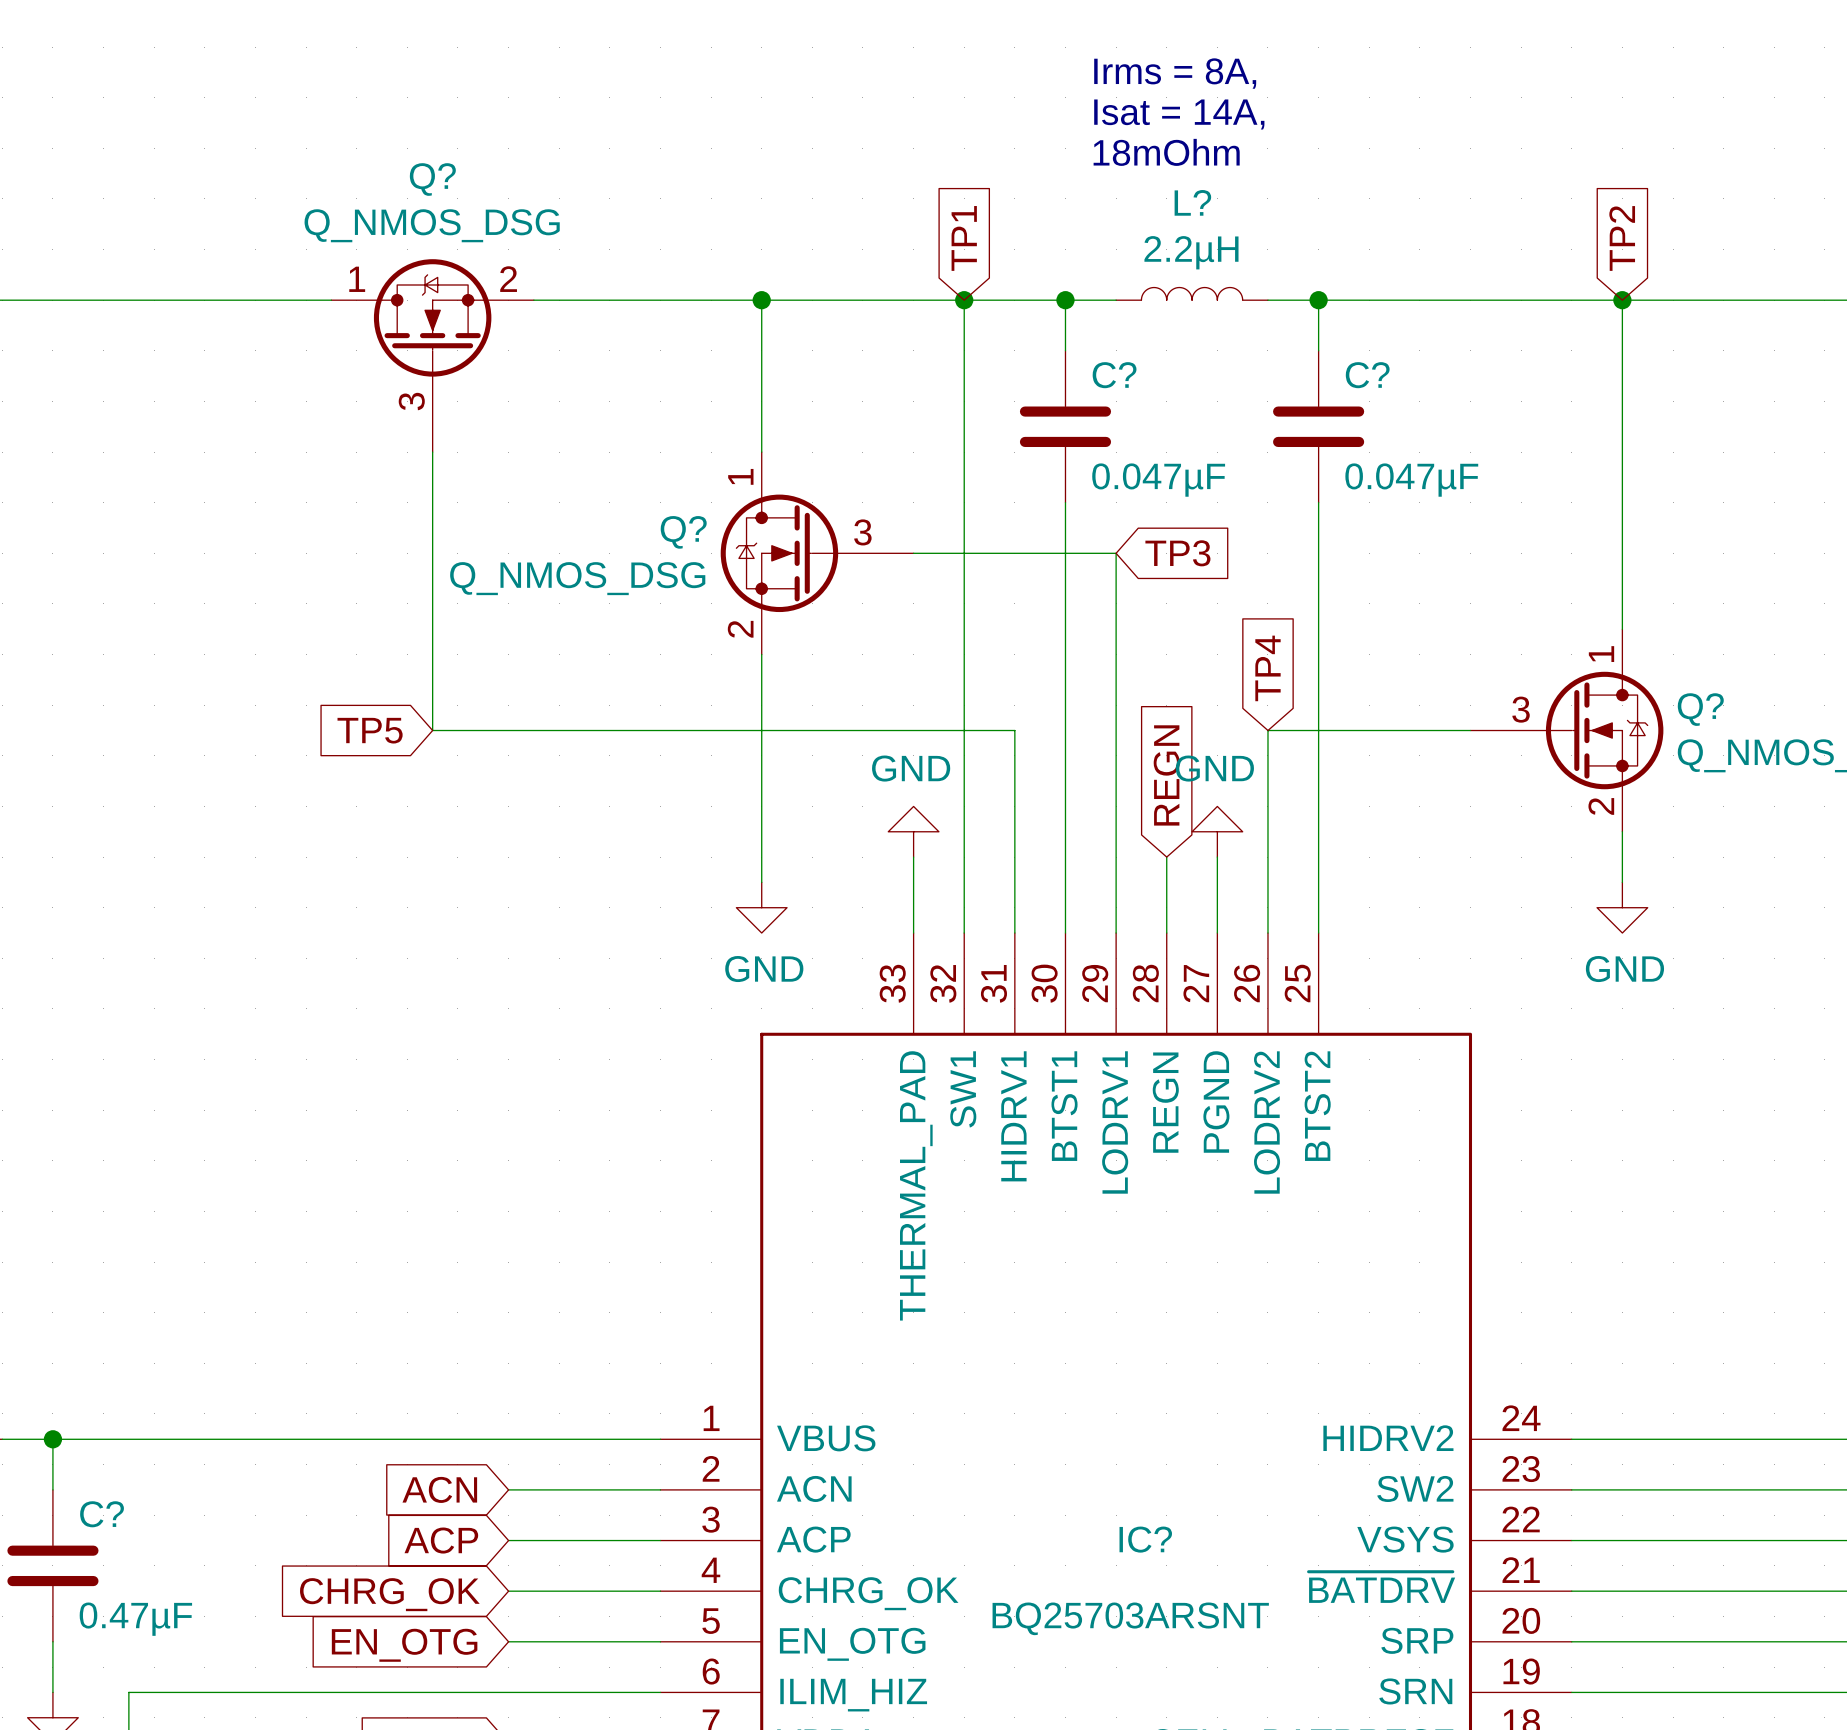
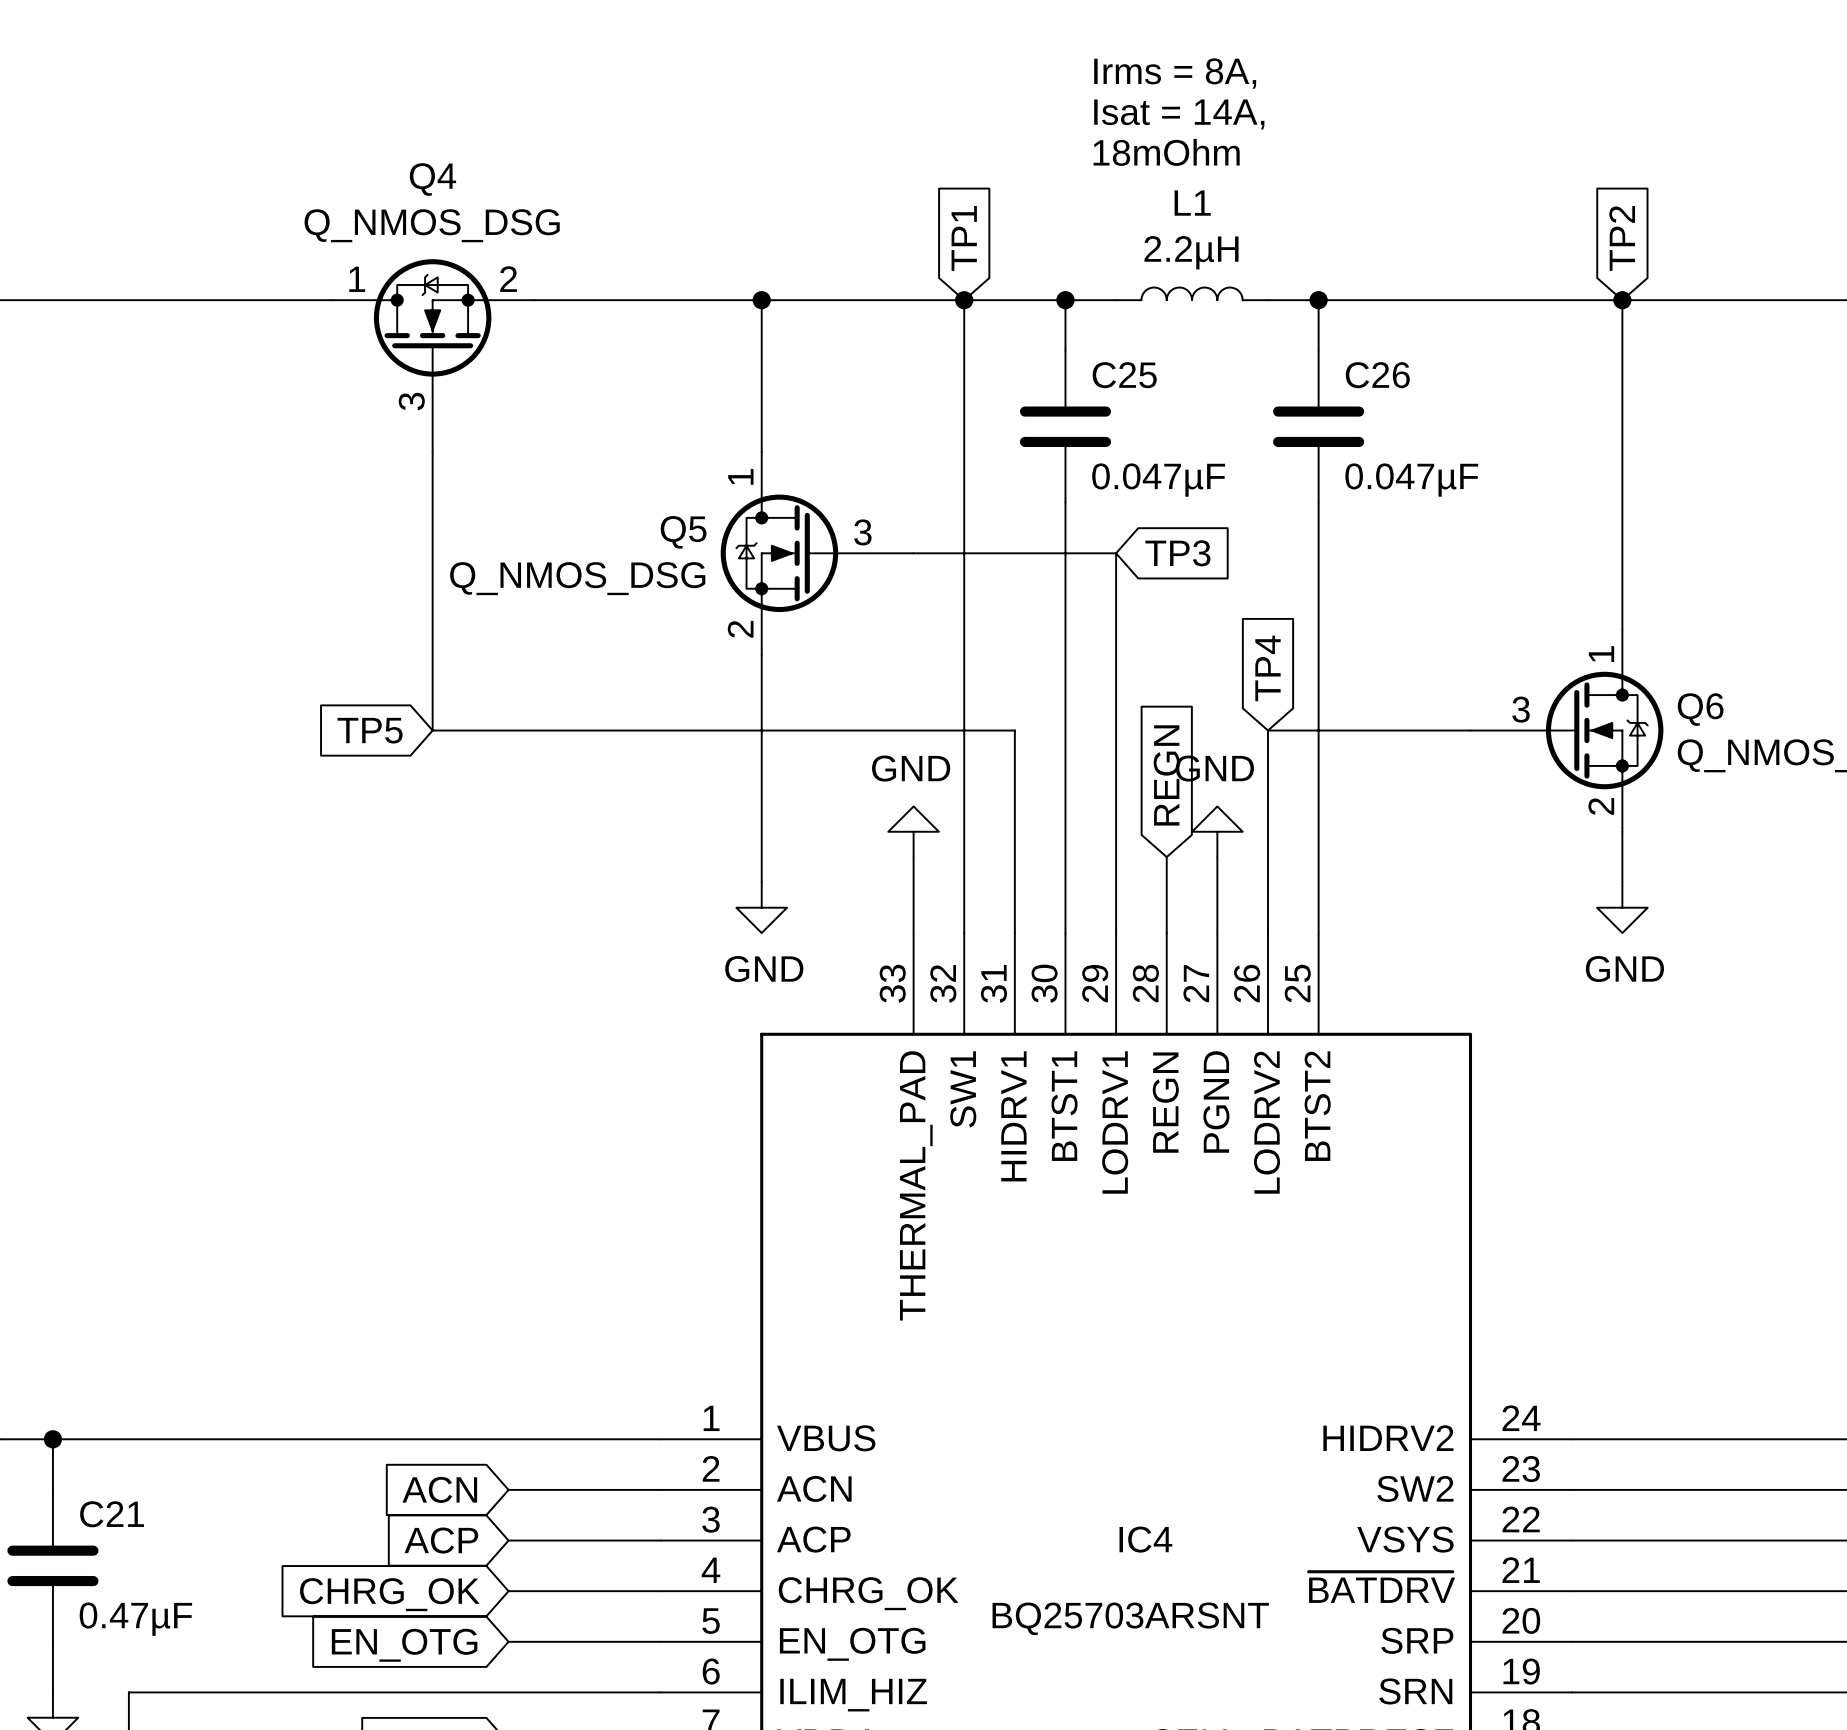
Q? name: Q? (432, 179) -> Q4 (432, 179)
L? name: L? (1192, 202) -> L1 (1192, 203)
C? name: C? (1114, 375) -> C25 (1124, 375)
C? name: C? (1367, 375) -> C26 (1377, 375)
Q? name: Q? (683, 532) -> Q5 (683, 532)
Q? name: Q? (1700, 709) -> Q6 (1700, 709)
C? name: C? (102, 1514) -> C21 (112, 1514)
IC? name: IC? (1145, 1539) -> IC4 (1145, 1539)

